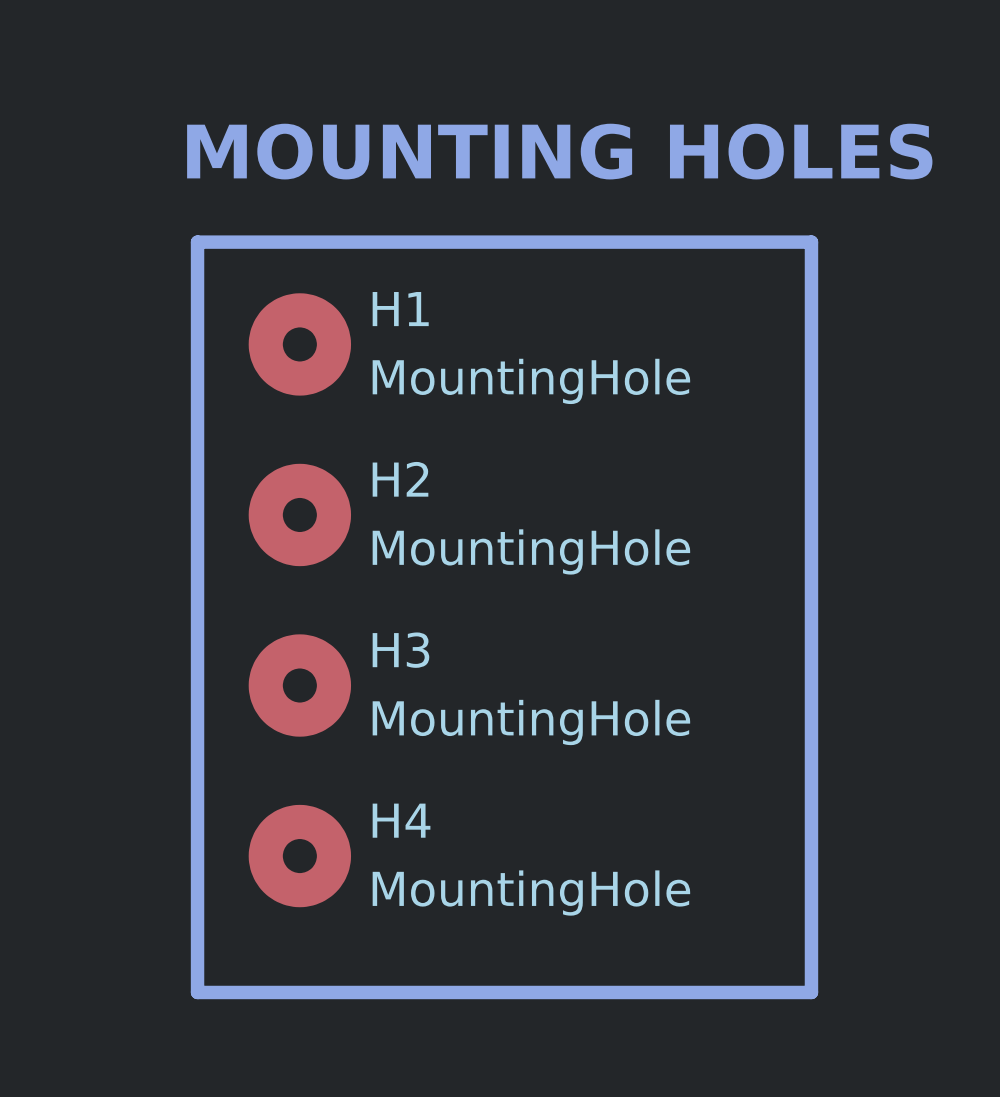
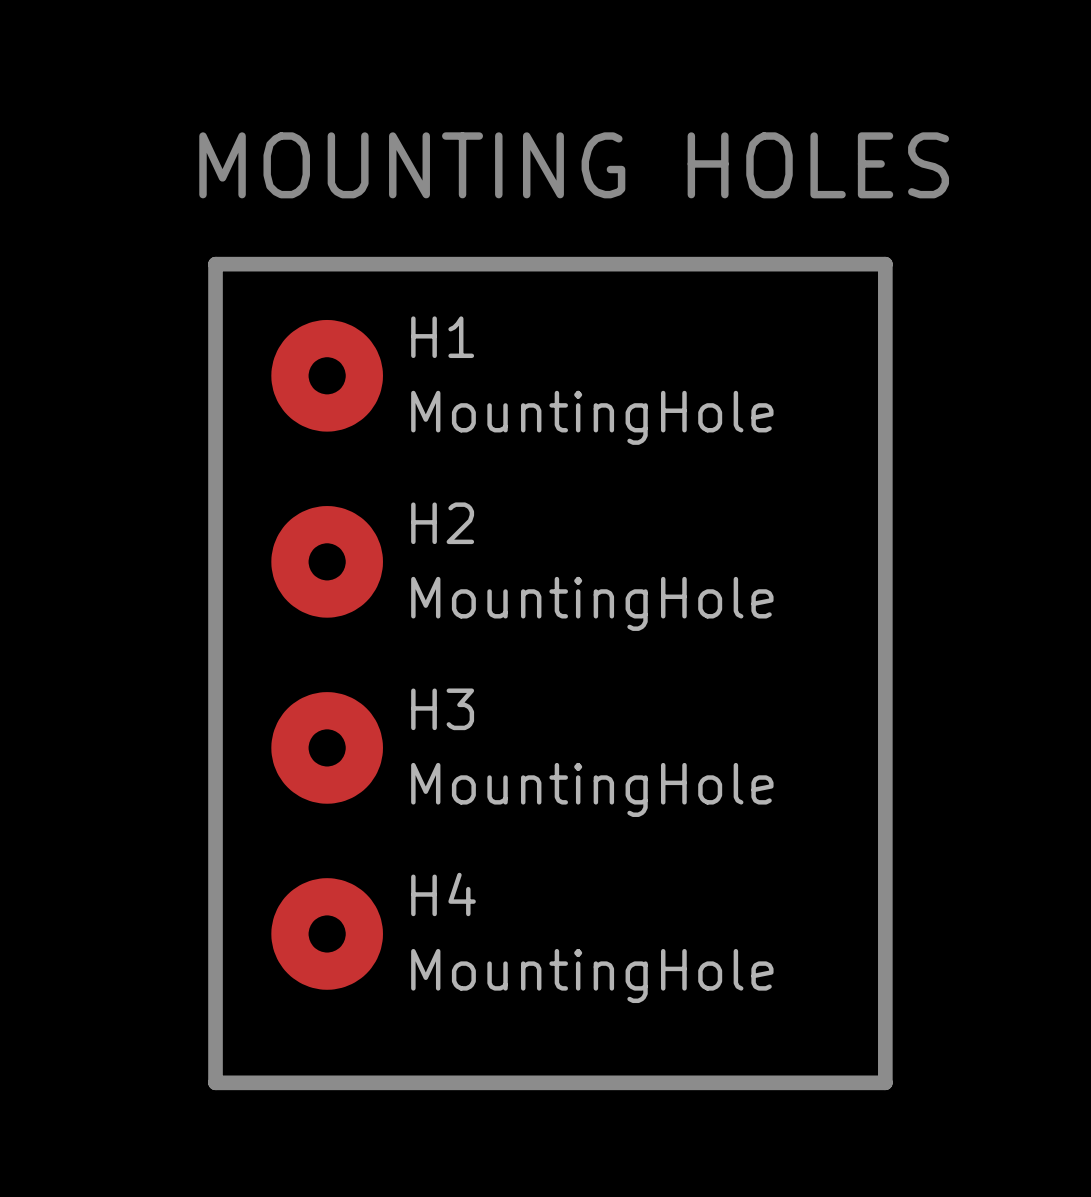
text position: MOUNTING HOLES (559, 151) -> MOUNTING HOLES (574, 165)

